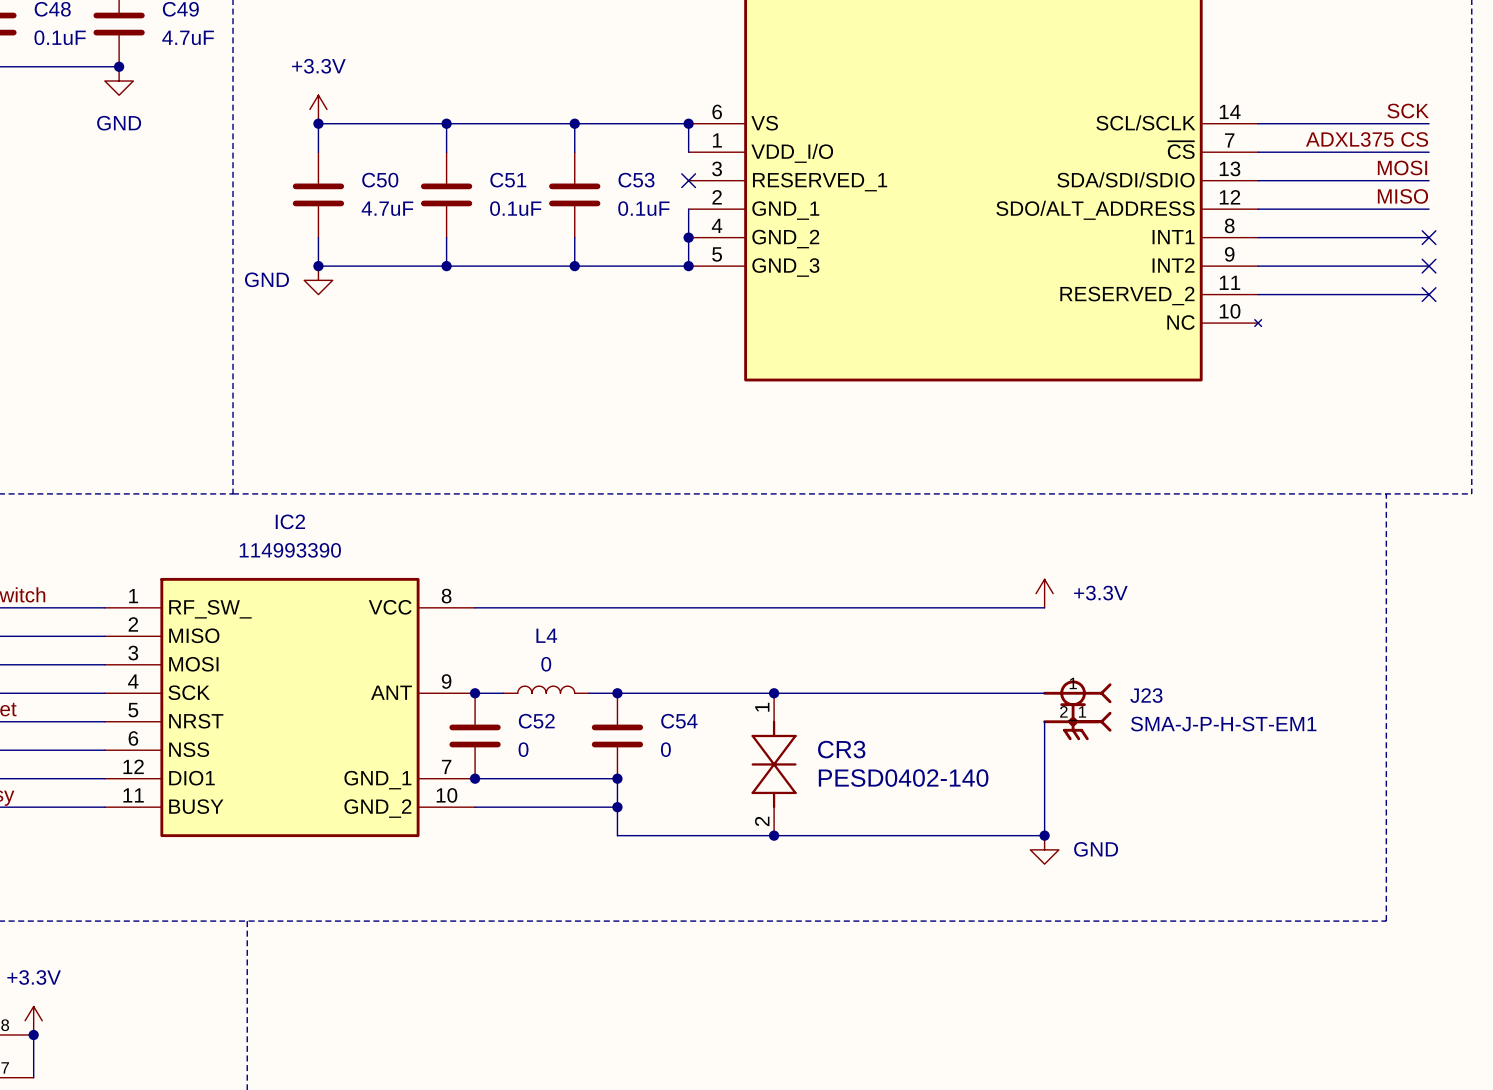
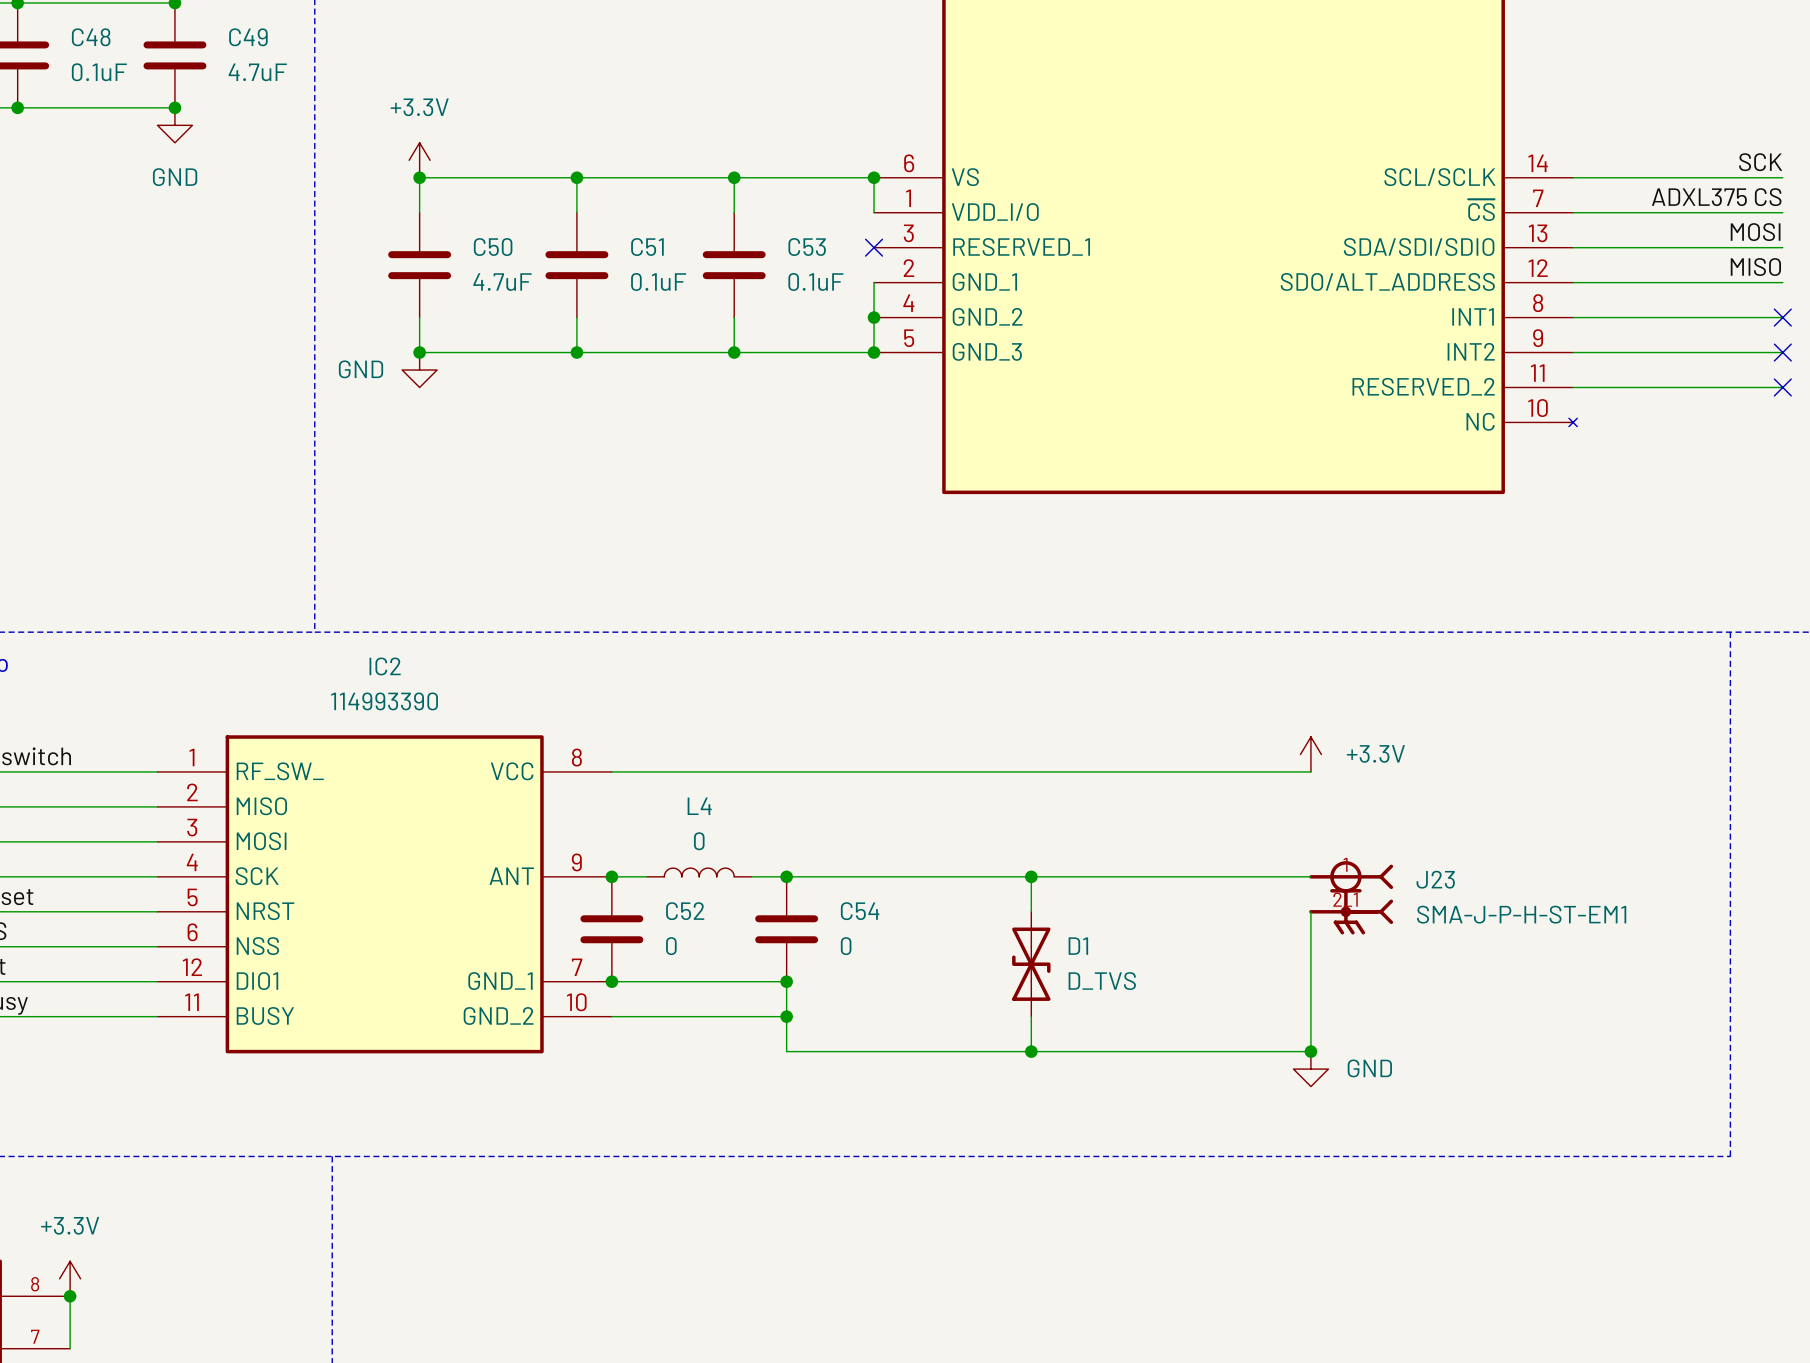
junction position: (774, 693) -> (1031, 876)
wire: none -> (1031, 876) (1031, 911)
CR3: PESD0402-140 (774, 764) -> none
D1: none -> D_TVS (1031, 964)
wire: none -> (1031, 1016) (1031, 1051)
junction position: (774, 835) -> (1031, 1051)

